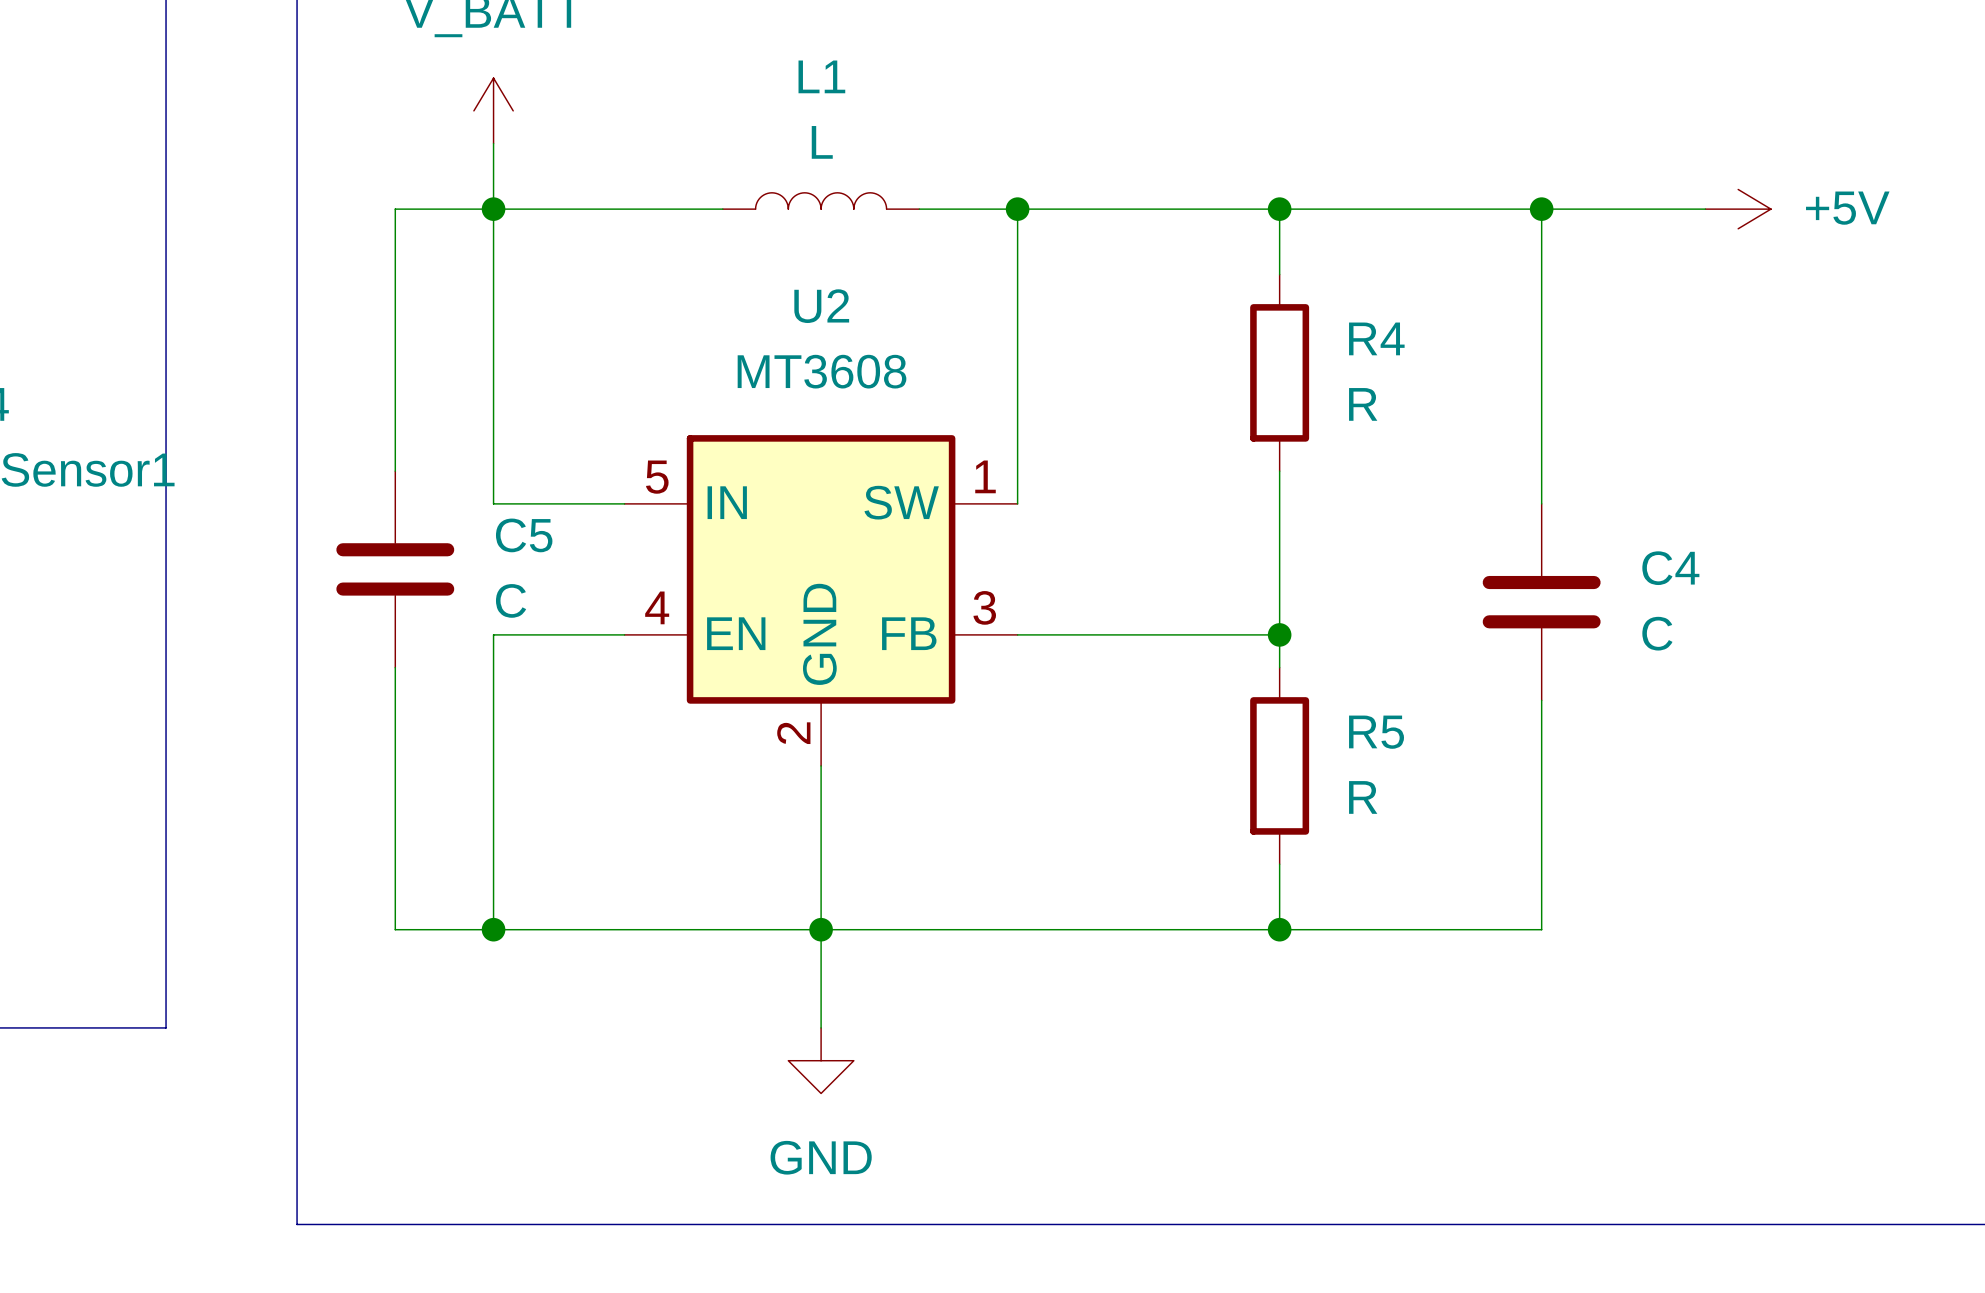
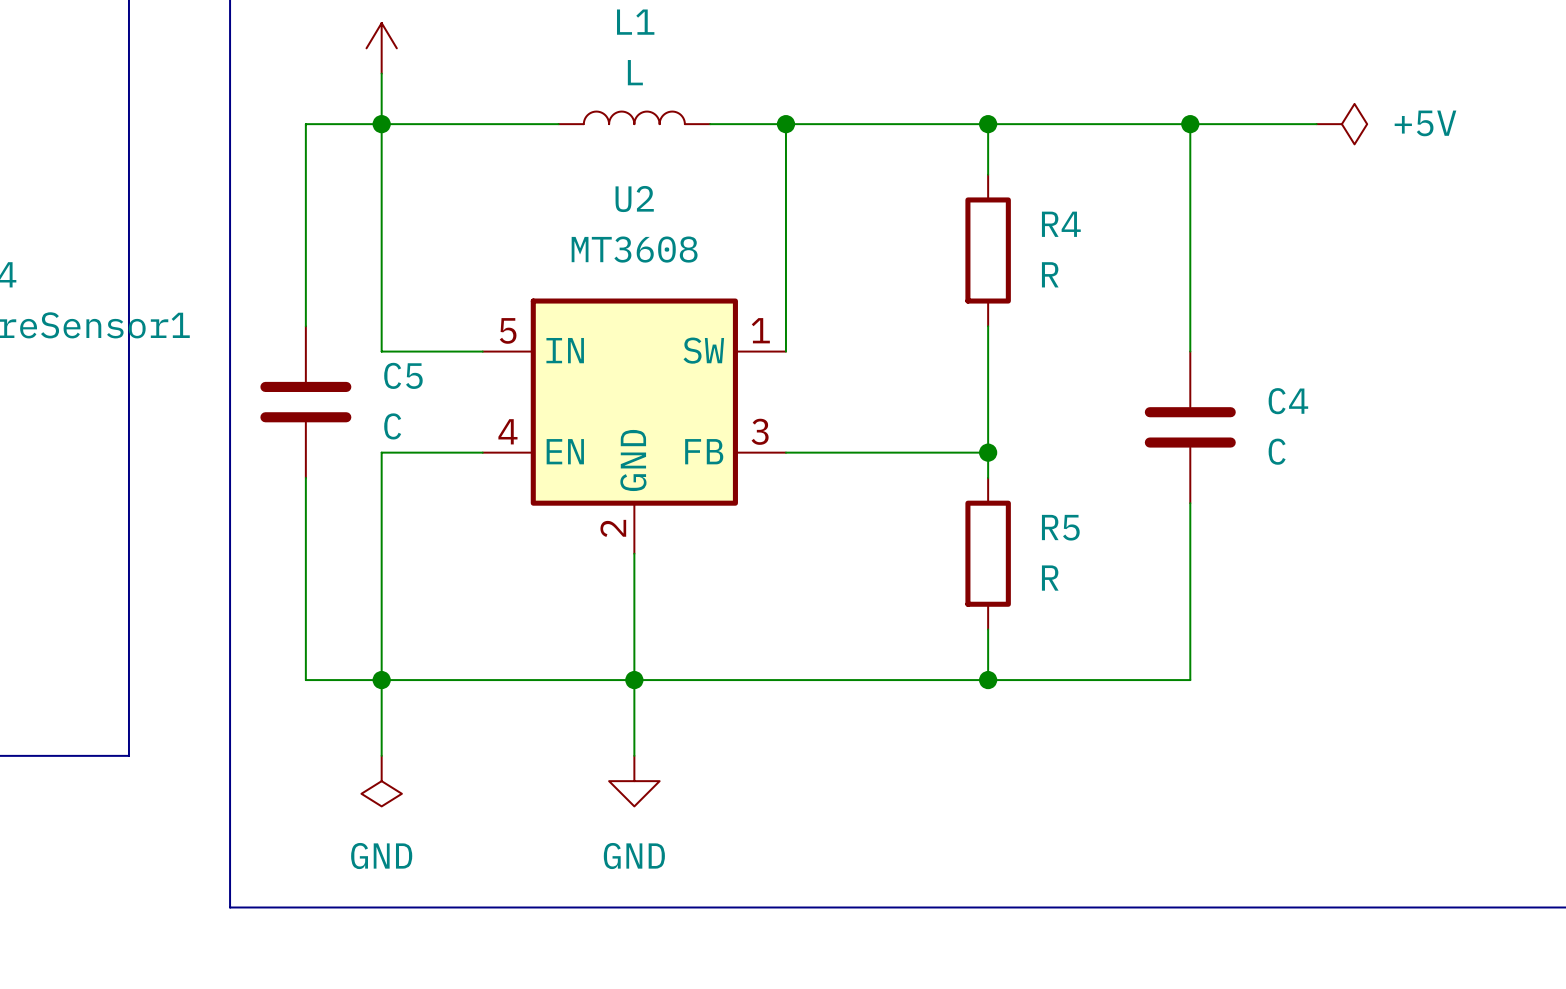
power symbol shape: [1705, 189, 1771, 229] -> [1316, 103, 1368, 145]
wire: none -> (381, 680) (381, 755)
power symbol: none -> GND (381, 781)

